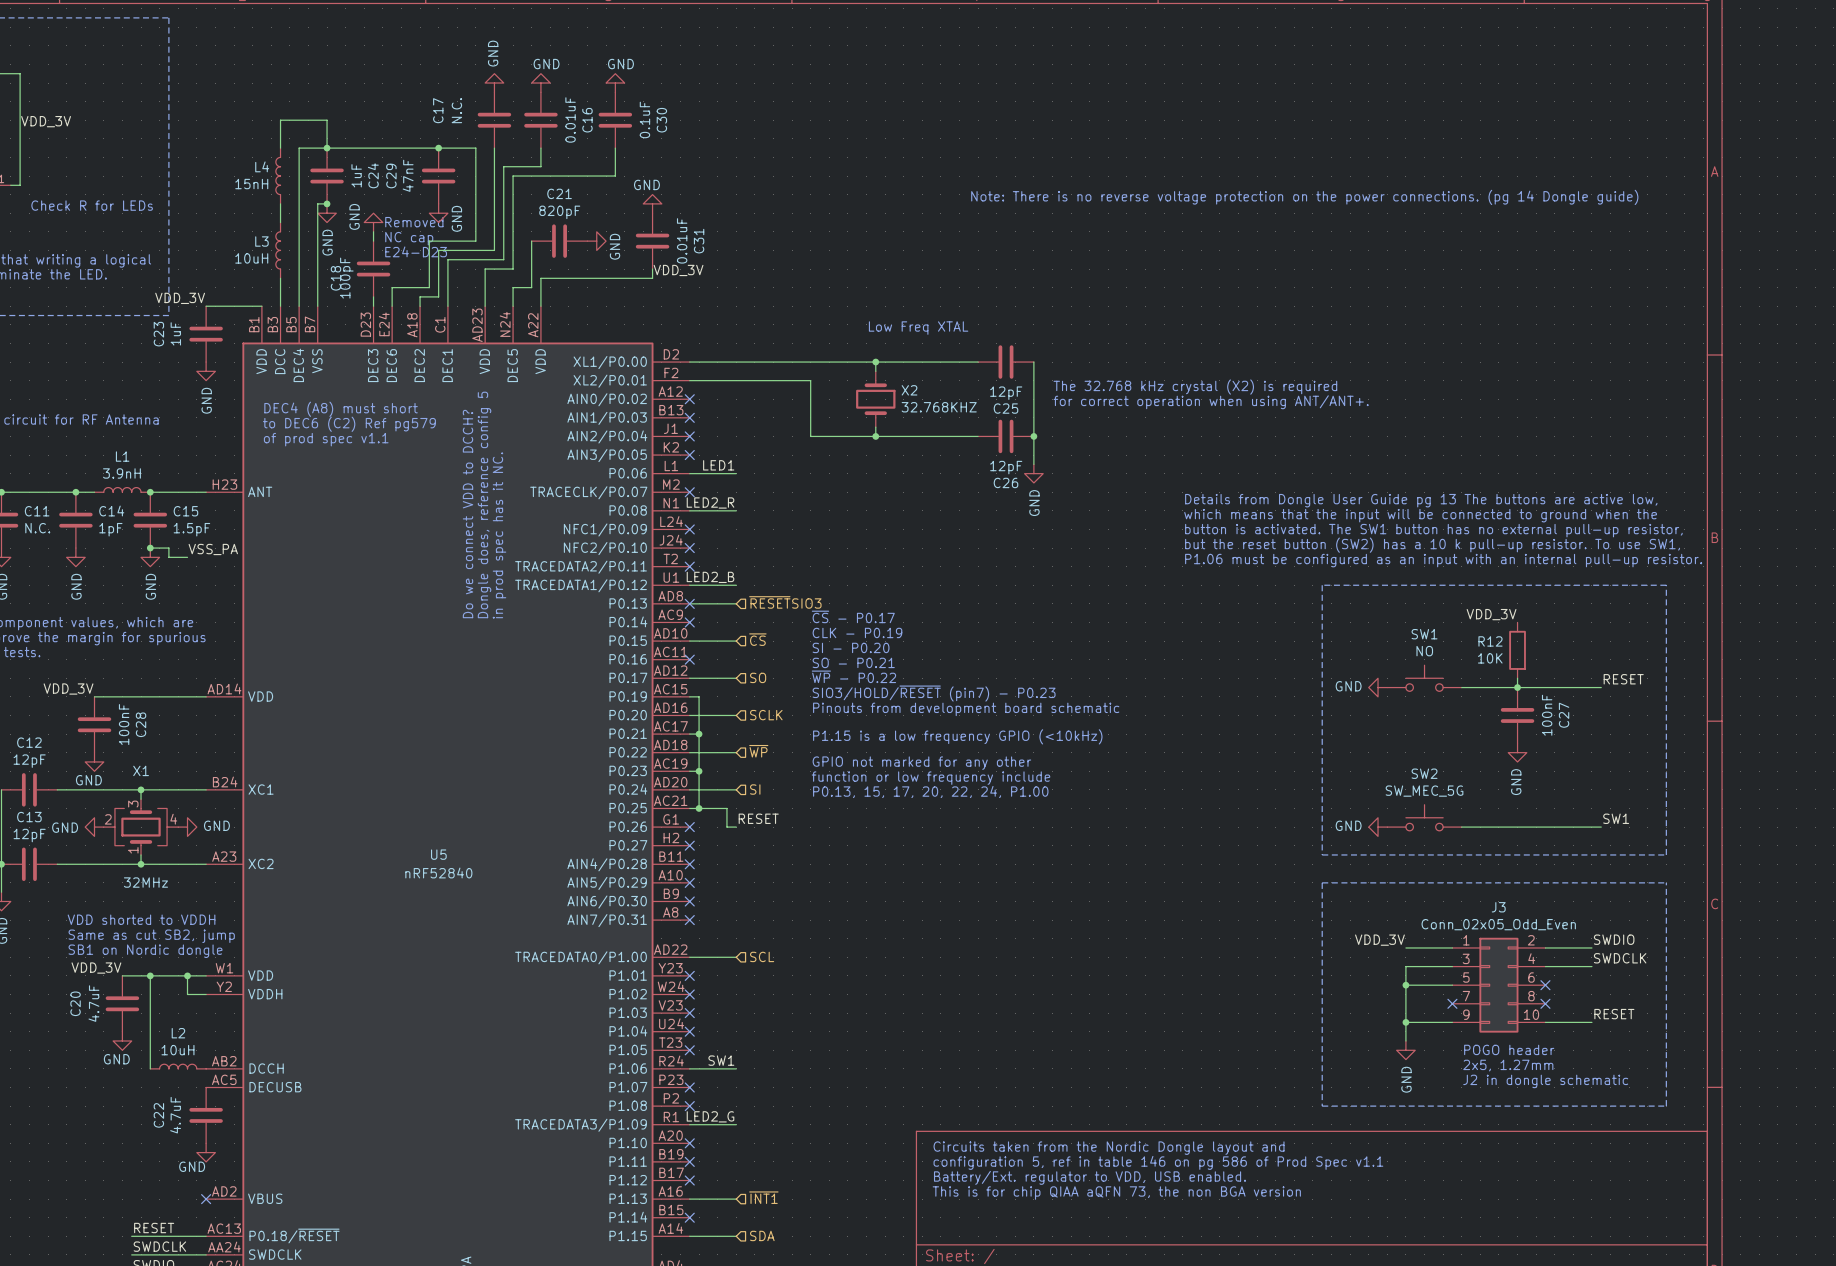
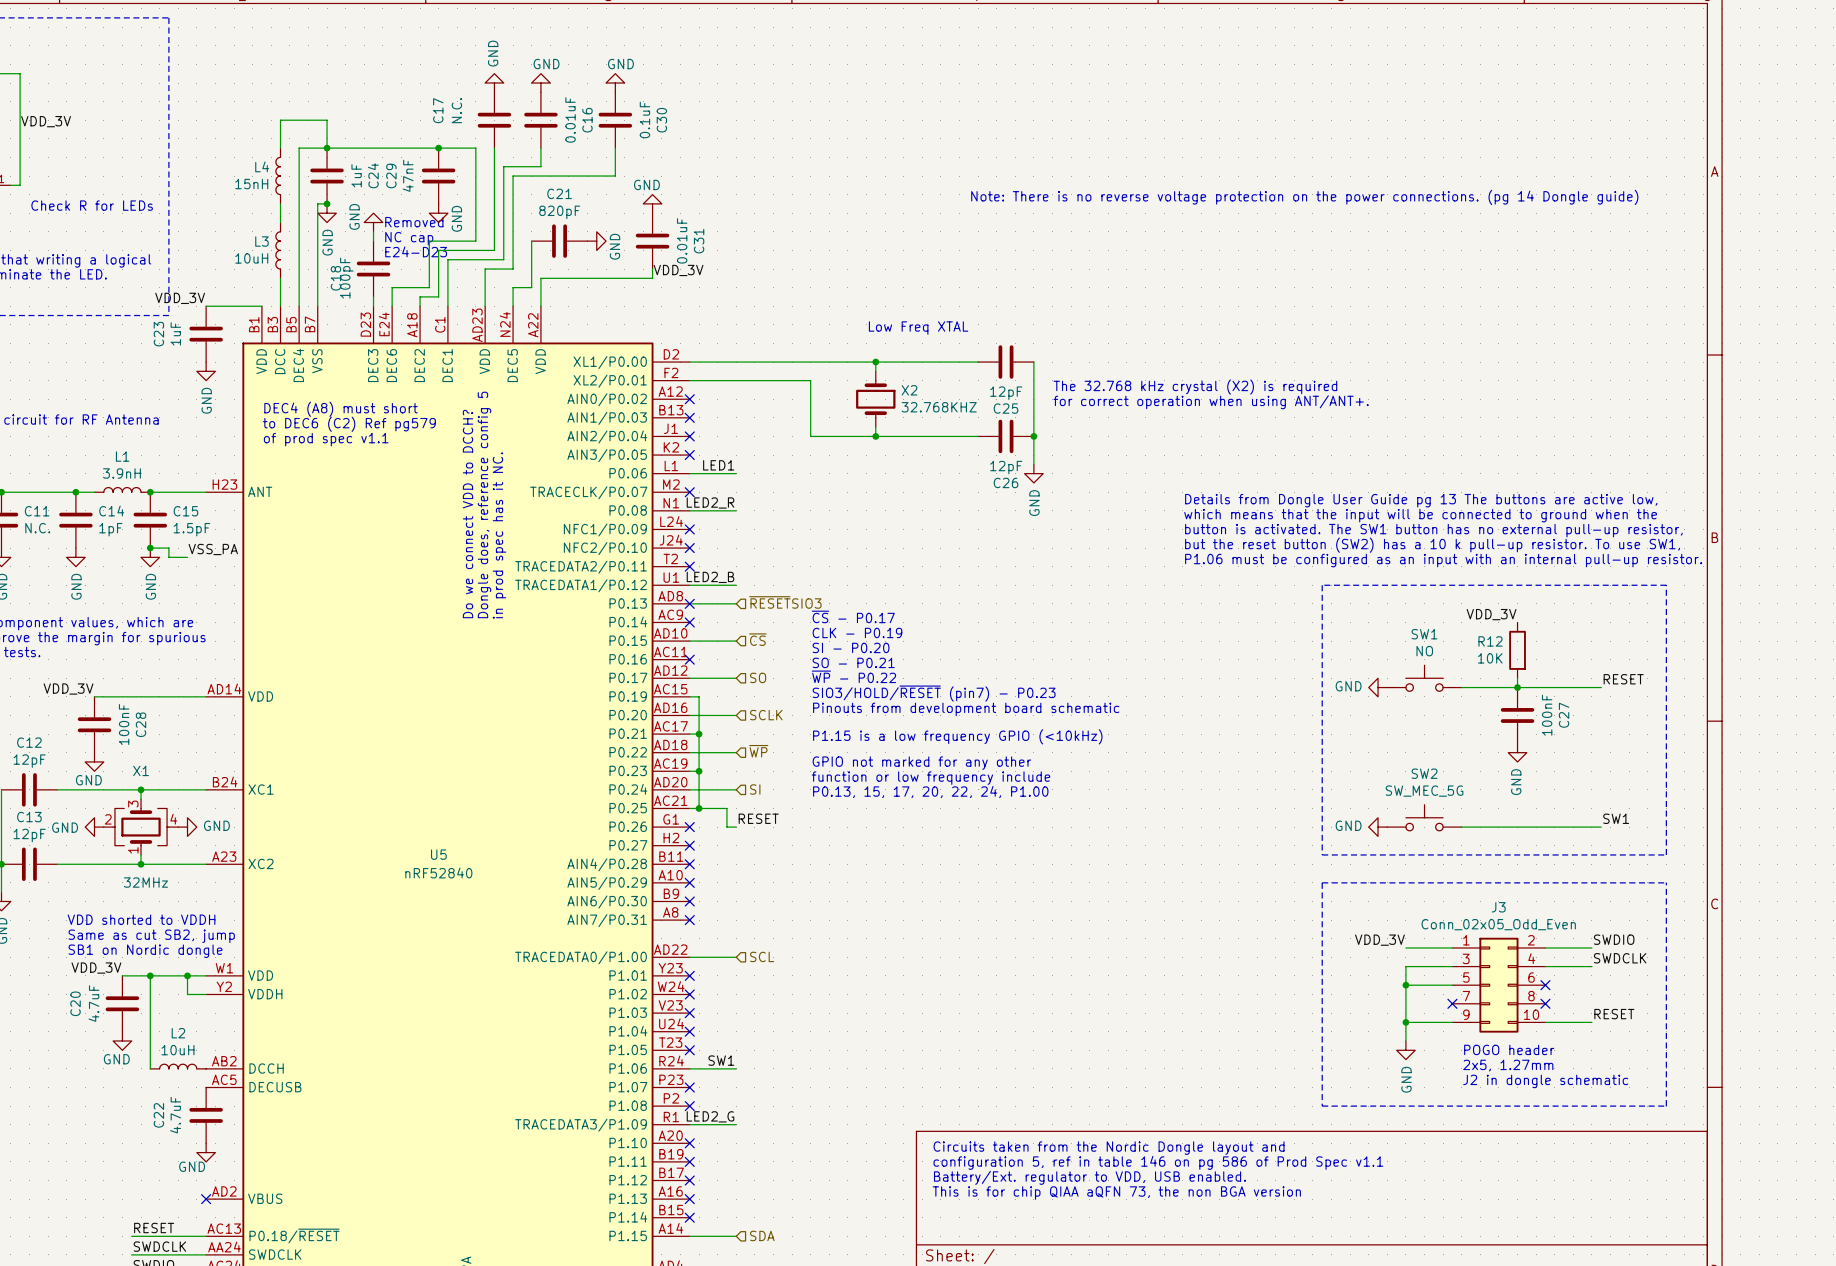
hierarchical label: ~{INT1} (763, 1197) -> none
wire: (689, 1199) (736, 1199) -> none
no-connect mark: none -> (689, 1199)

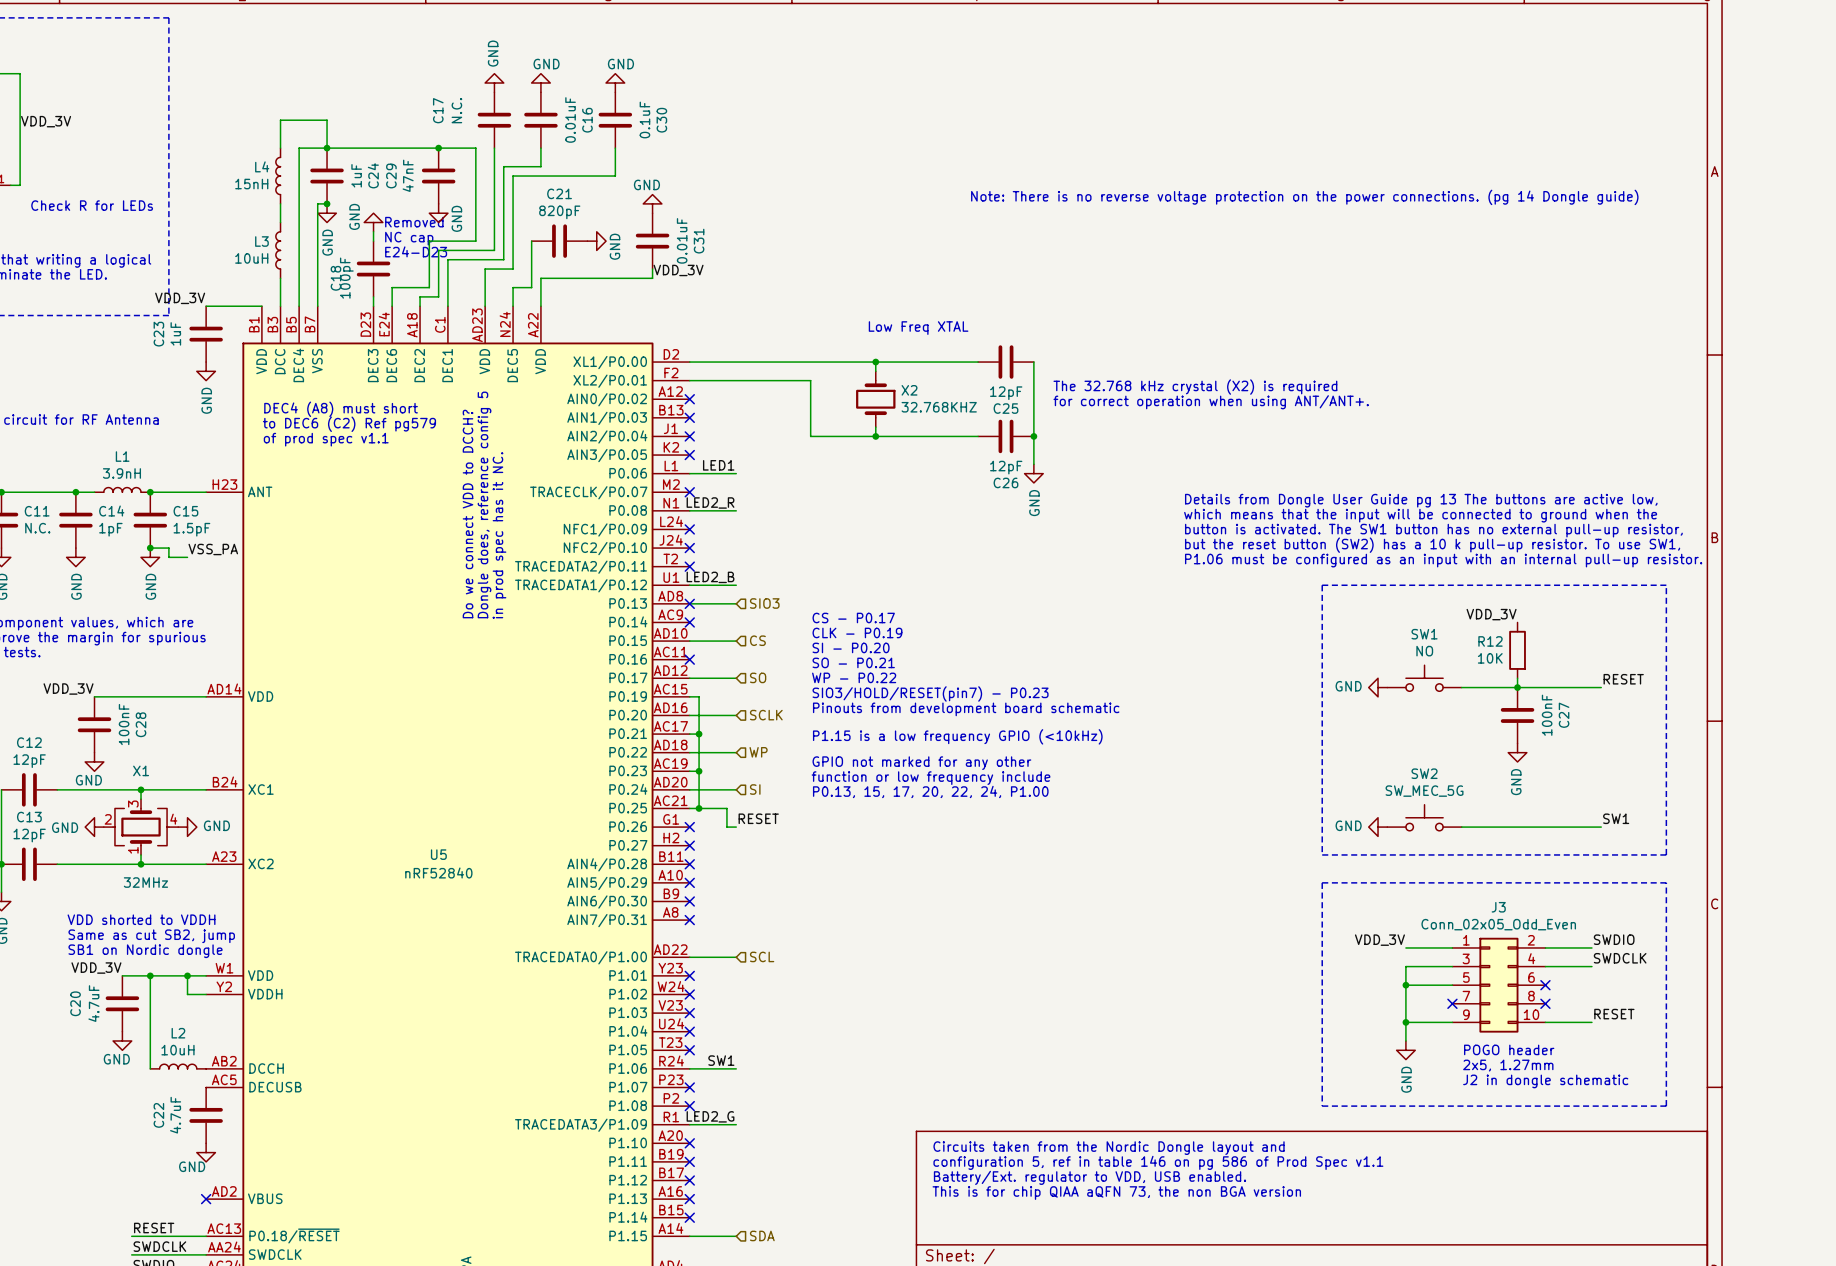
hierarchical label: ~{RESET}SIO3 (785, 602) -> SIO3 (764, 603)
text: ~{CS} - P0.17 (853, 616) -> CS - P0.17 (853, 617)
hierarchical label: ~{CS} (757, 639) -> CS (757, 640)
text: ~{WP} - P0.22 (853, 676) -> WP - P0.22 (854, 677)
text: SIO3/HOLD/~{RESET} (pin7) - P0.23 (934, 693) -> SIO3/HOLD/RESET(pin7) - P0.23 (930, 693)
hierarchical label: ~{WP} (758, 751) -> WP (758, 752)

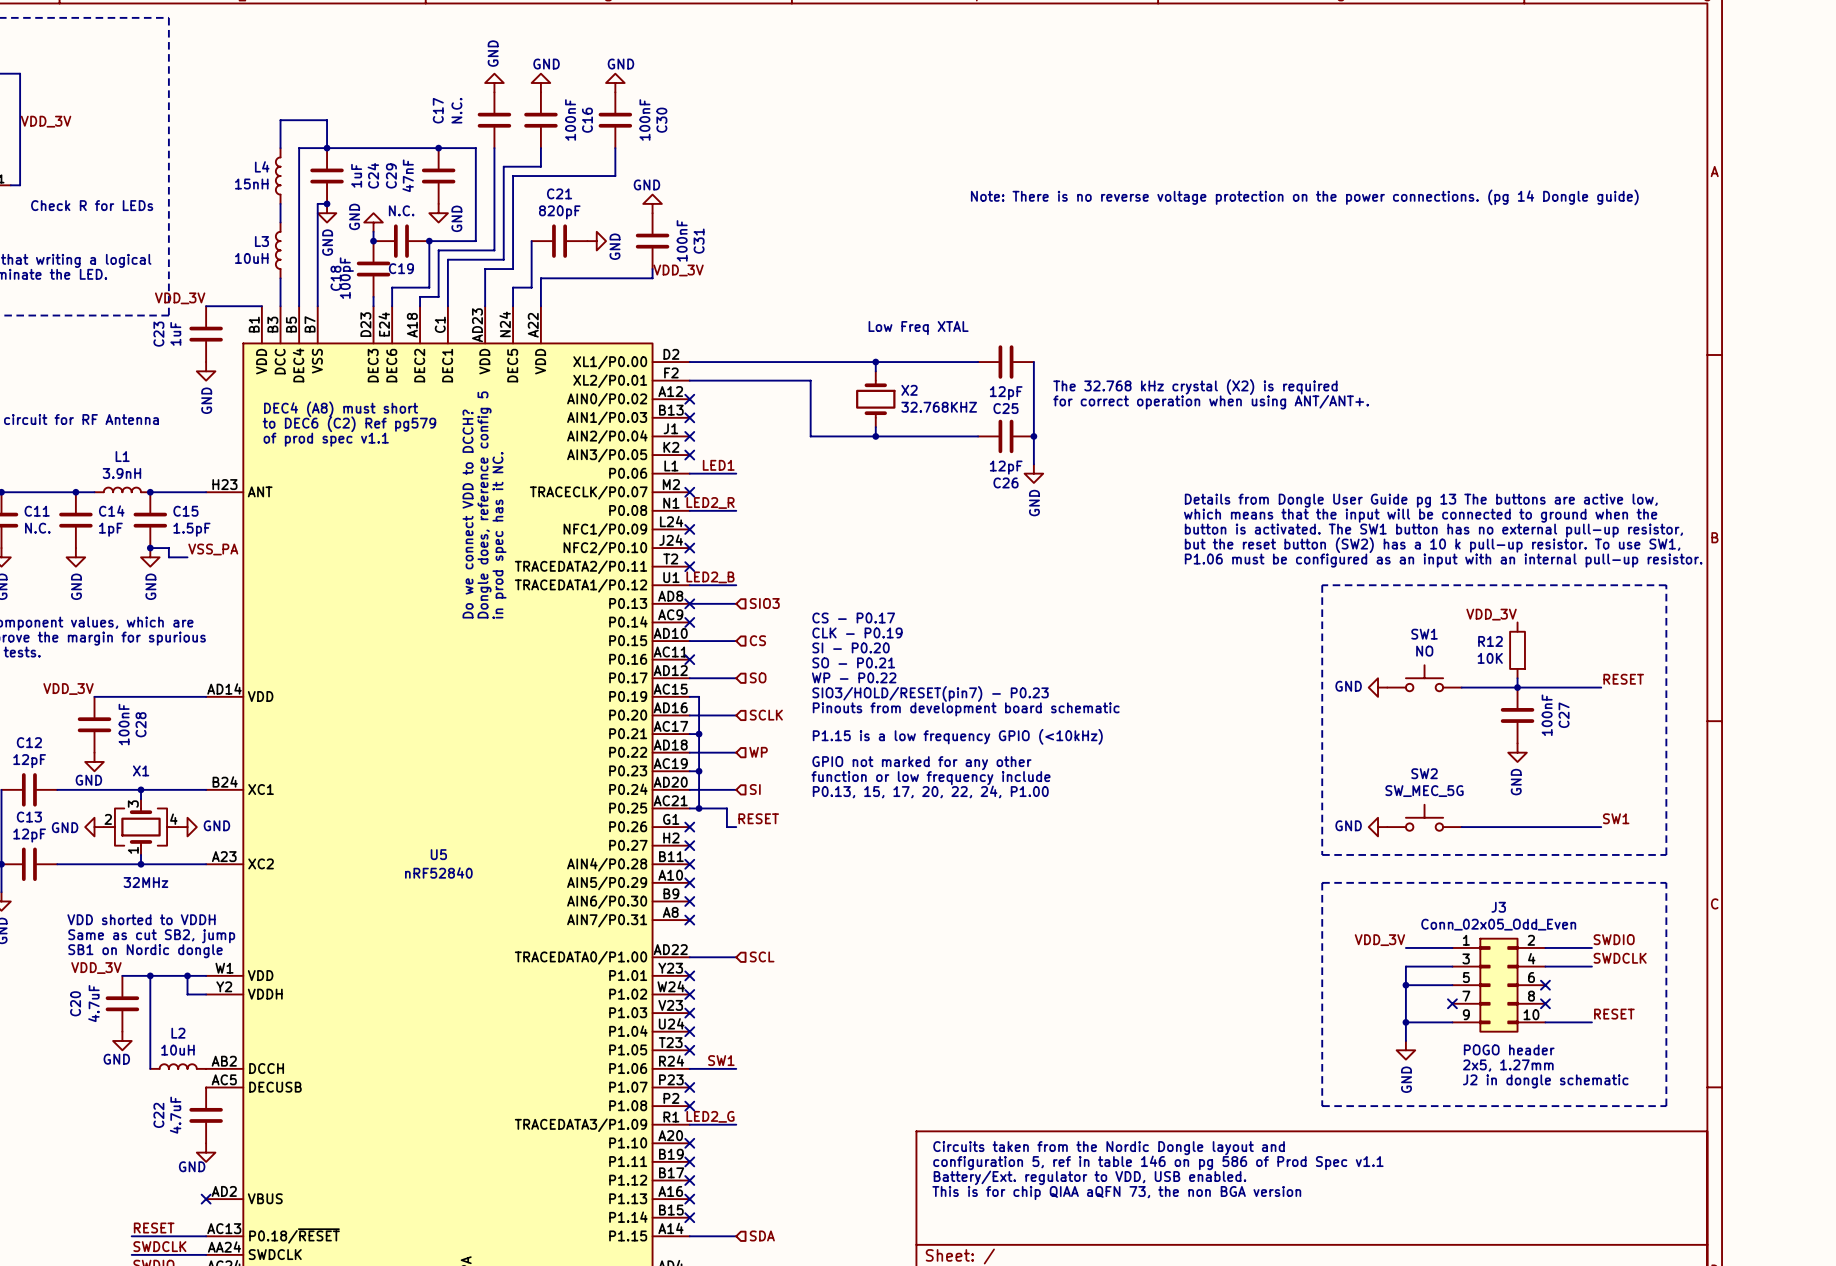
C16 value: 0.01uF (570, 119) -> 100nF (570, 119)
C30 value: 0.1uF (644, 119) -> 100nF (644, 119)
text: Removed (414, 222) -> none
text: NC cap (409, 238) -> none
C31 value: 0.01uF (682, 240) -> 100nF (682, 240)
junction: none -> (373, 241)
C19: none -> N.C. (401, 241)
junction: none -> (429, 241)
text: E24-D23 (416, 251) -> none

